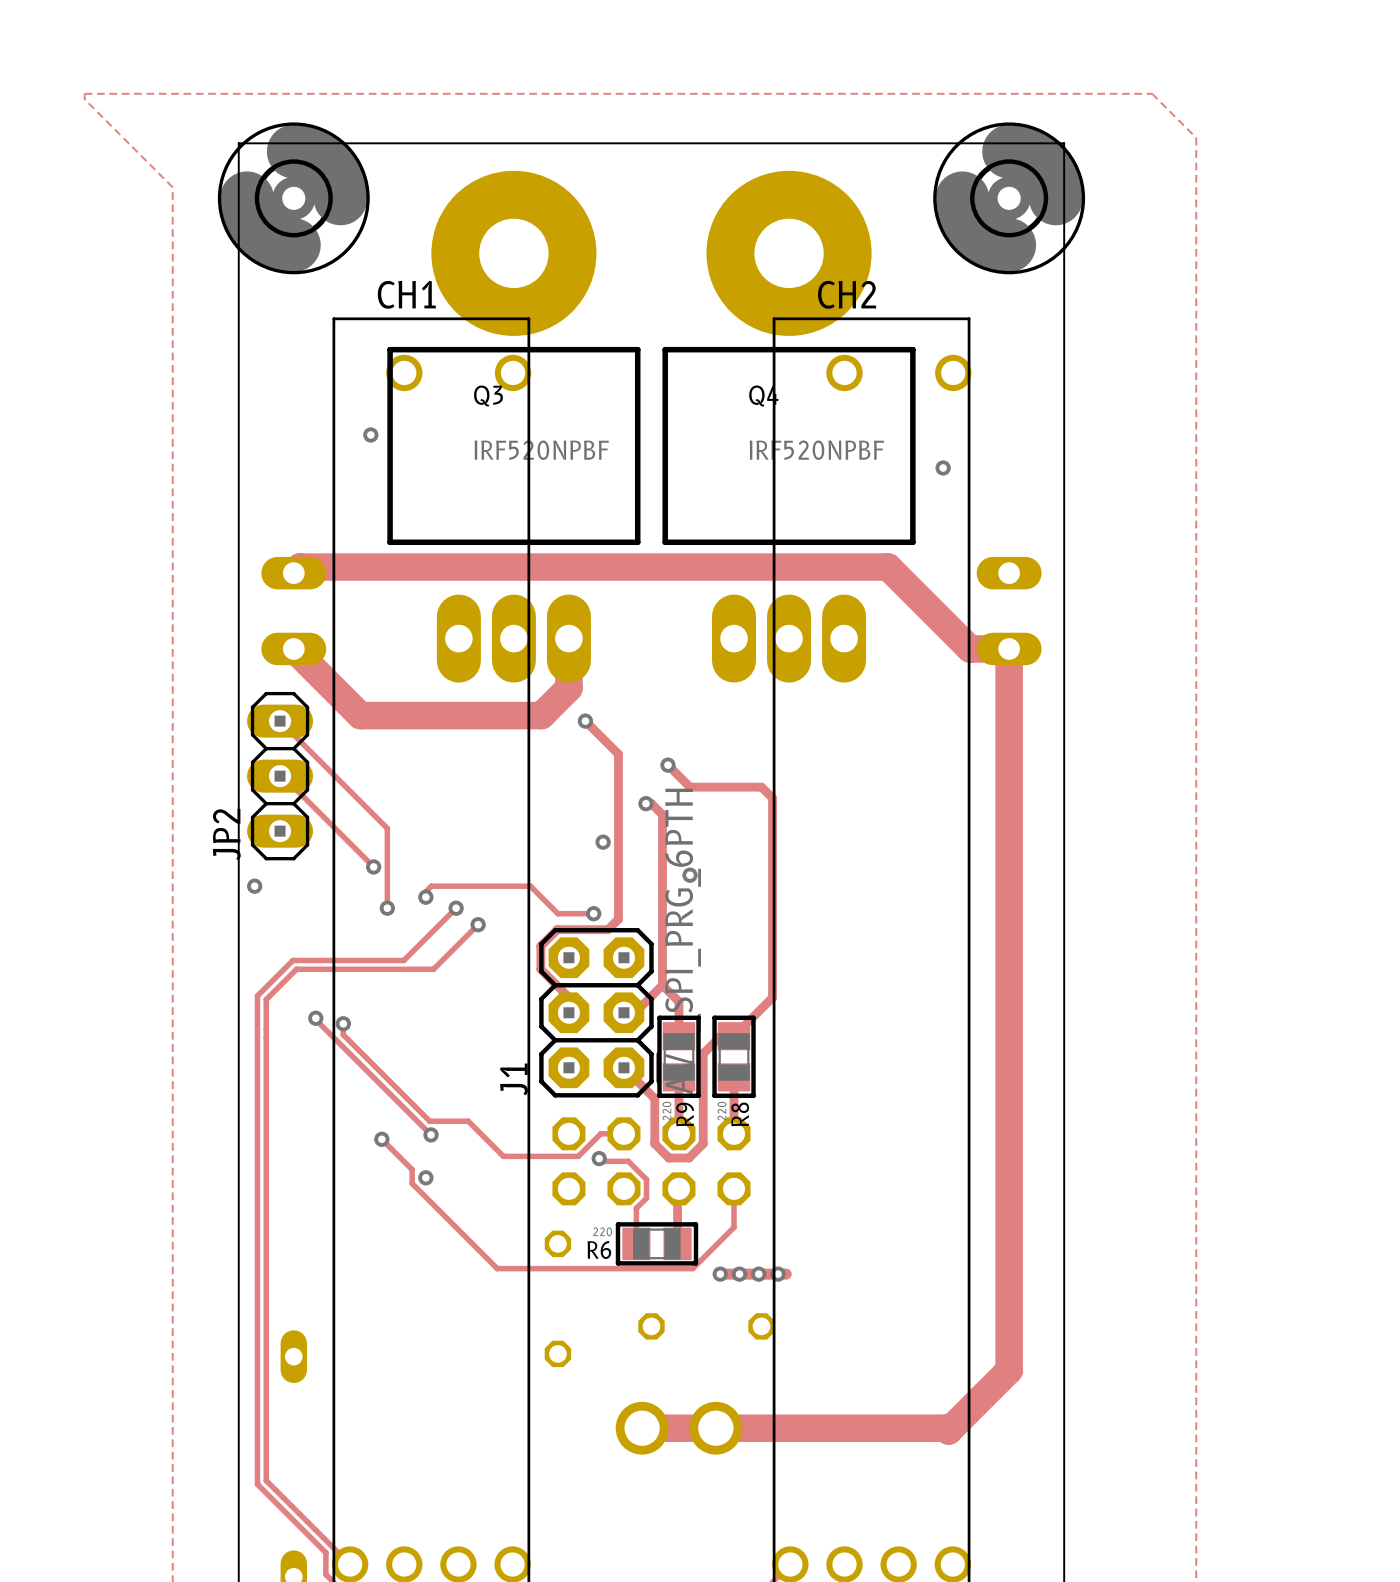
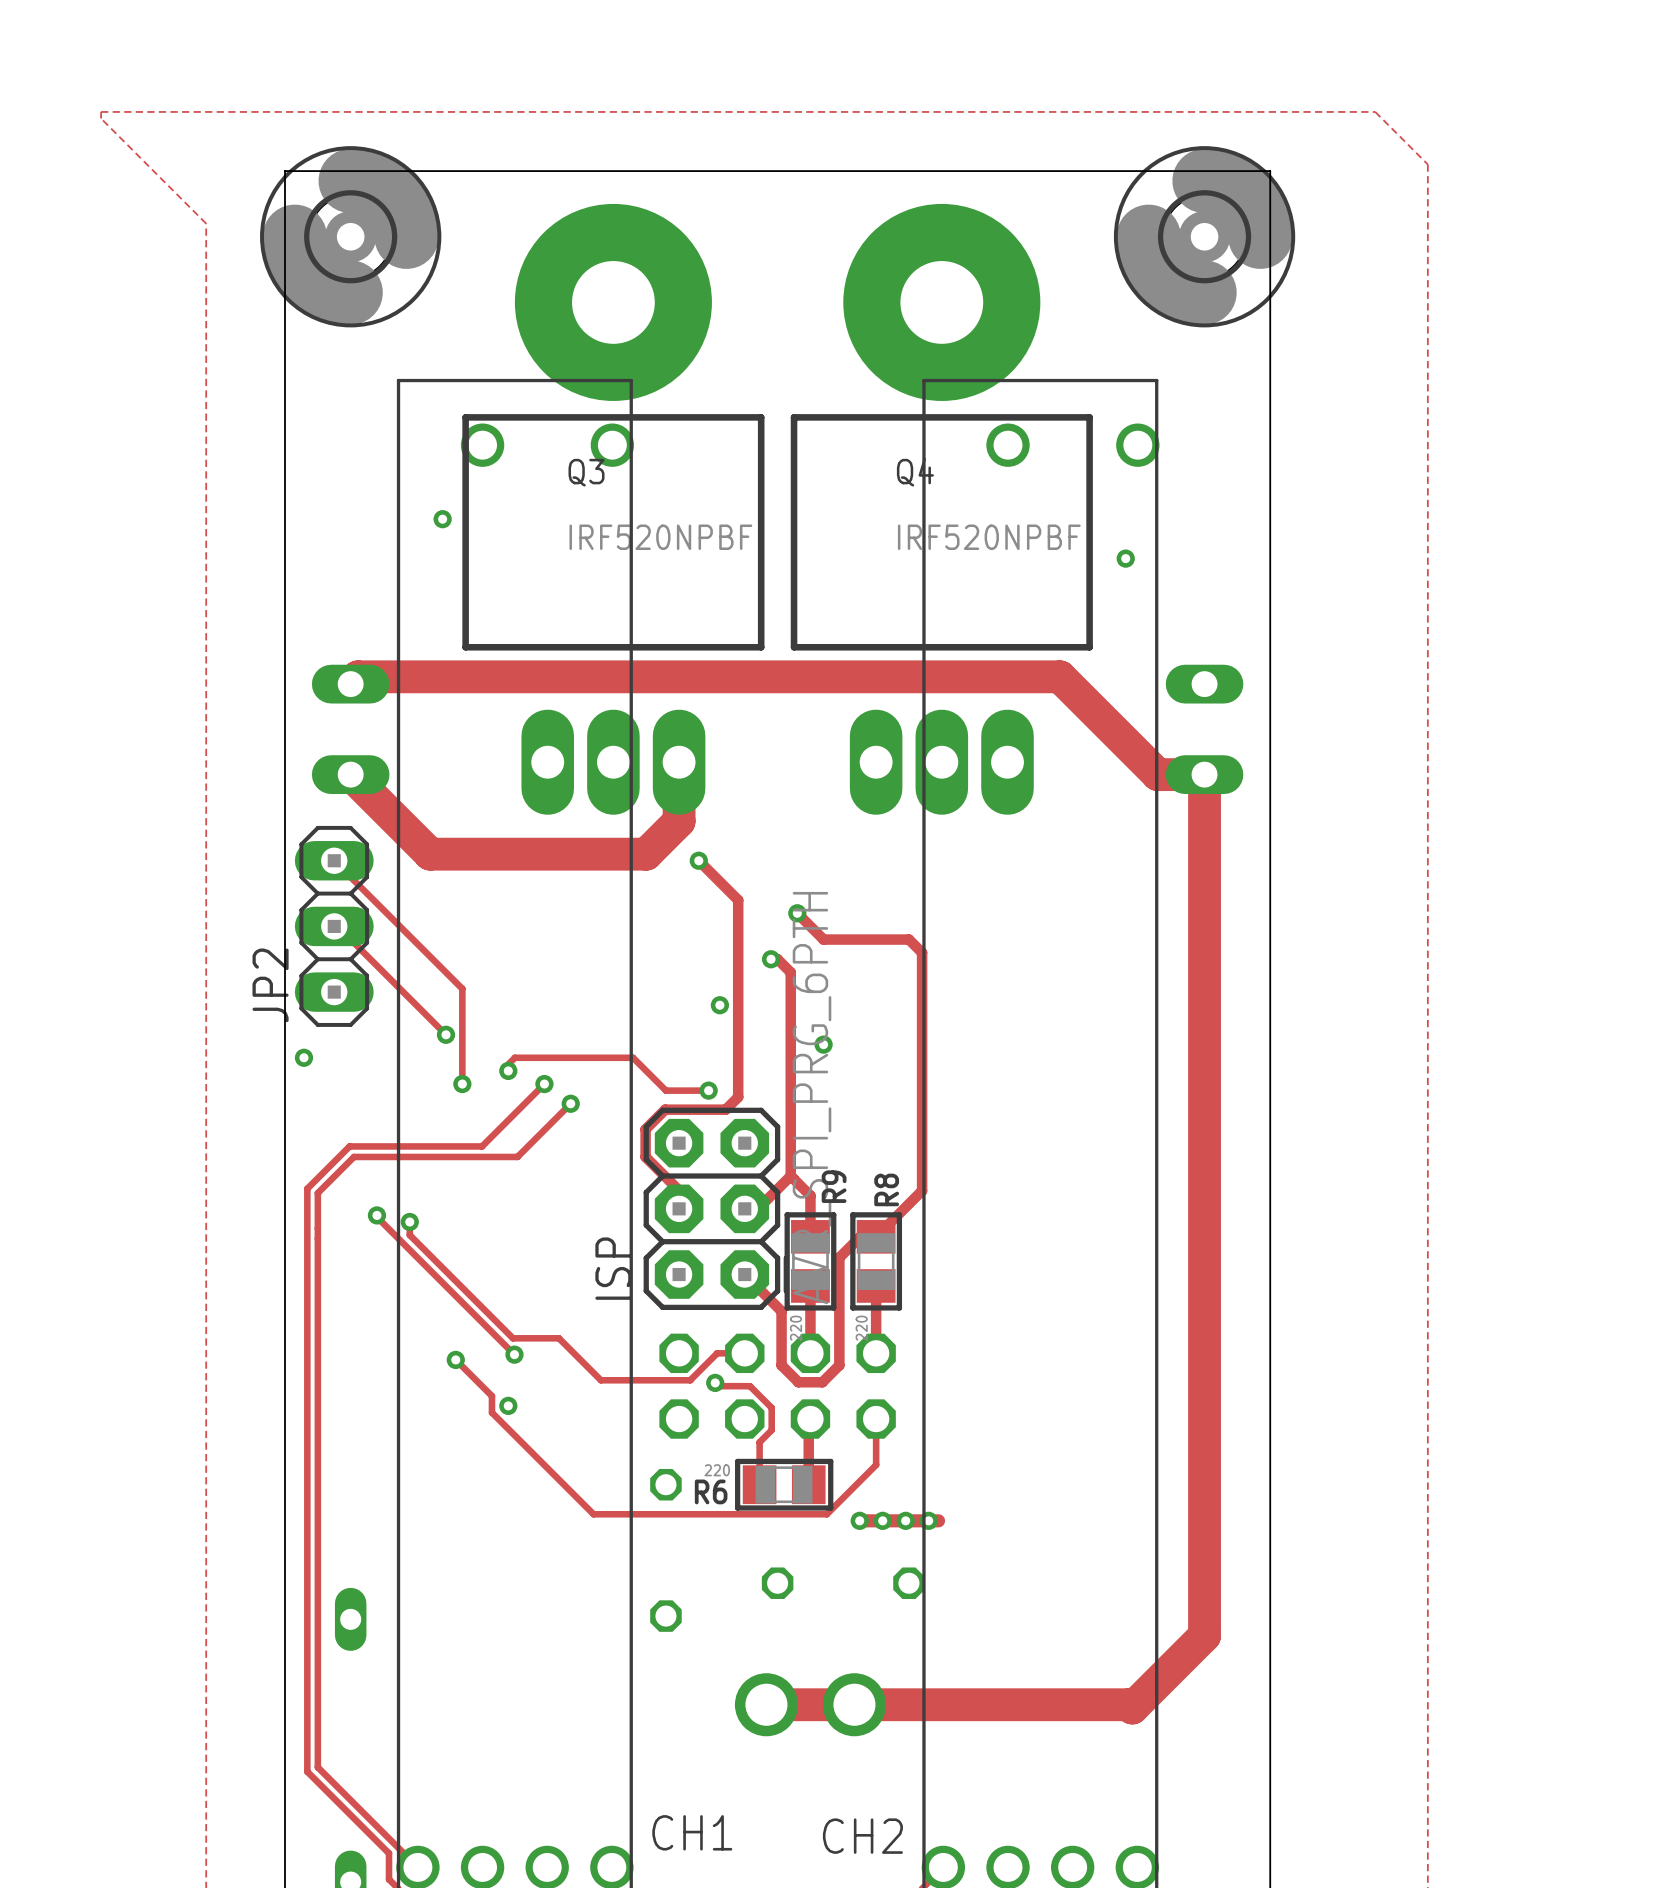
CH1 name position: CH1 (406, 294) -> CH1 (692, 1832)
CH2 name position: CH2 (847, 294) -> CH2 (862, 1836)
J1 name: J1 (514, 1079) -> ISP (613, 1268)
R9 name position: R9 (685, 1114) -> R9 (834, 1186)
R8 name position: R8 (740, 1114) -> R8 (886, 1189)

